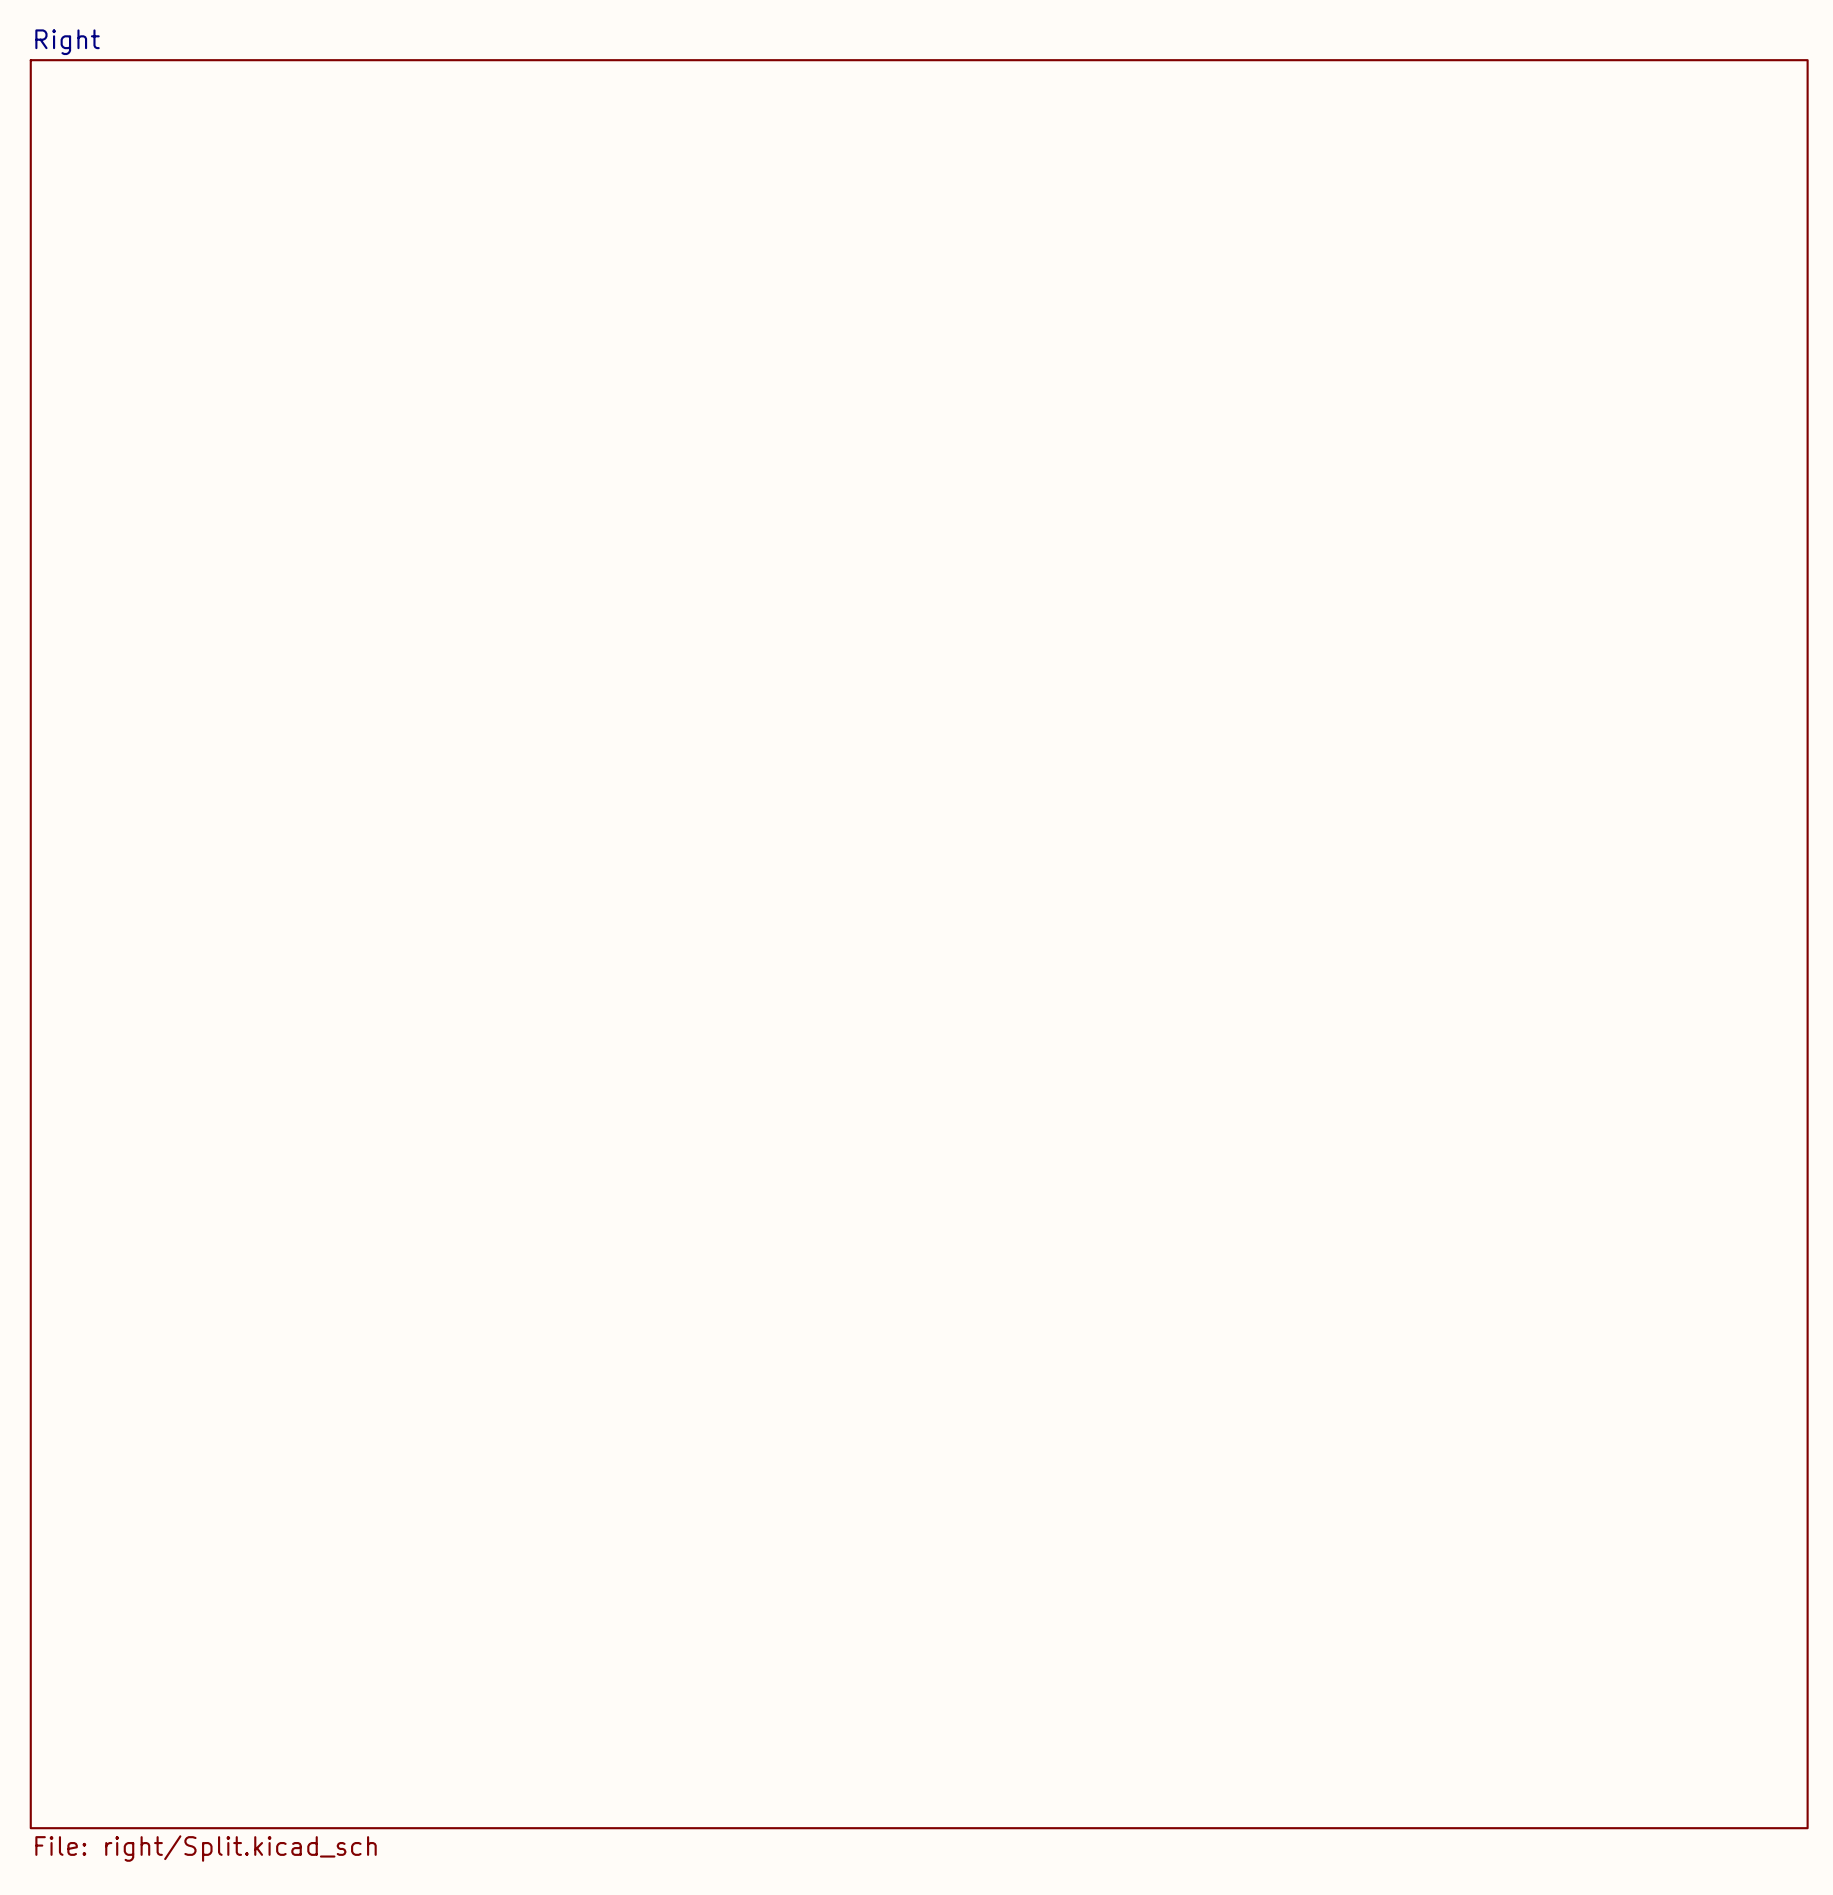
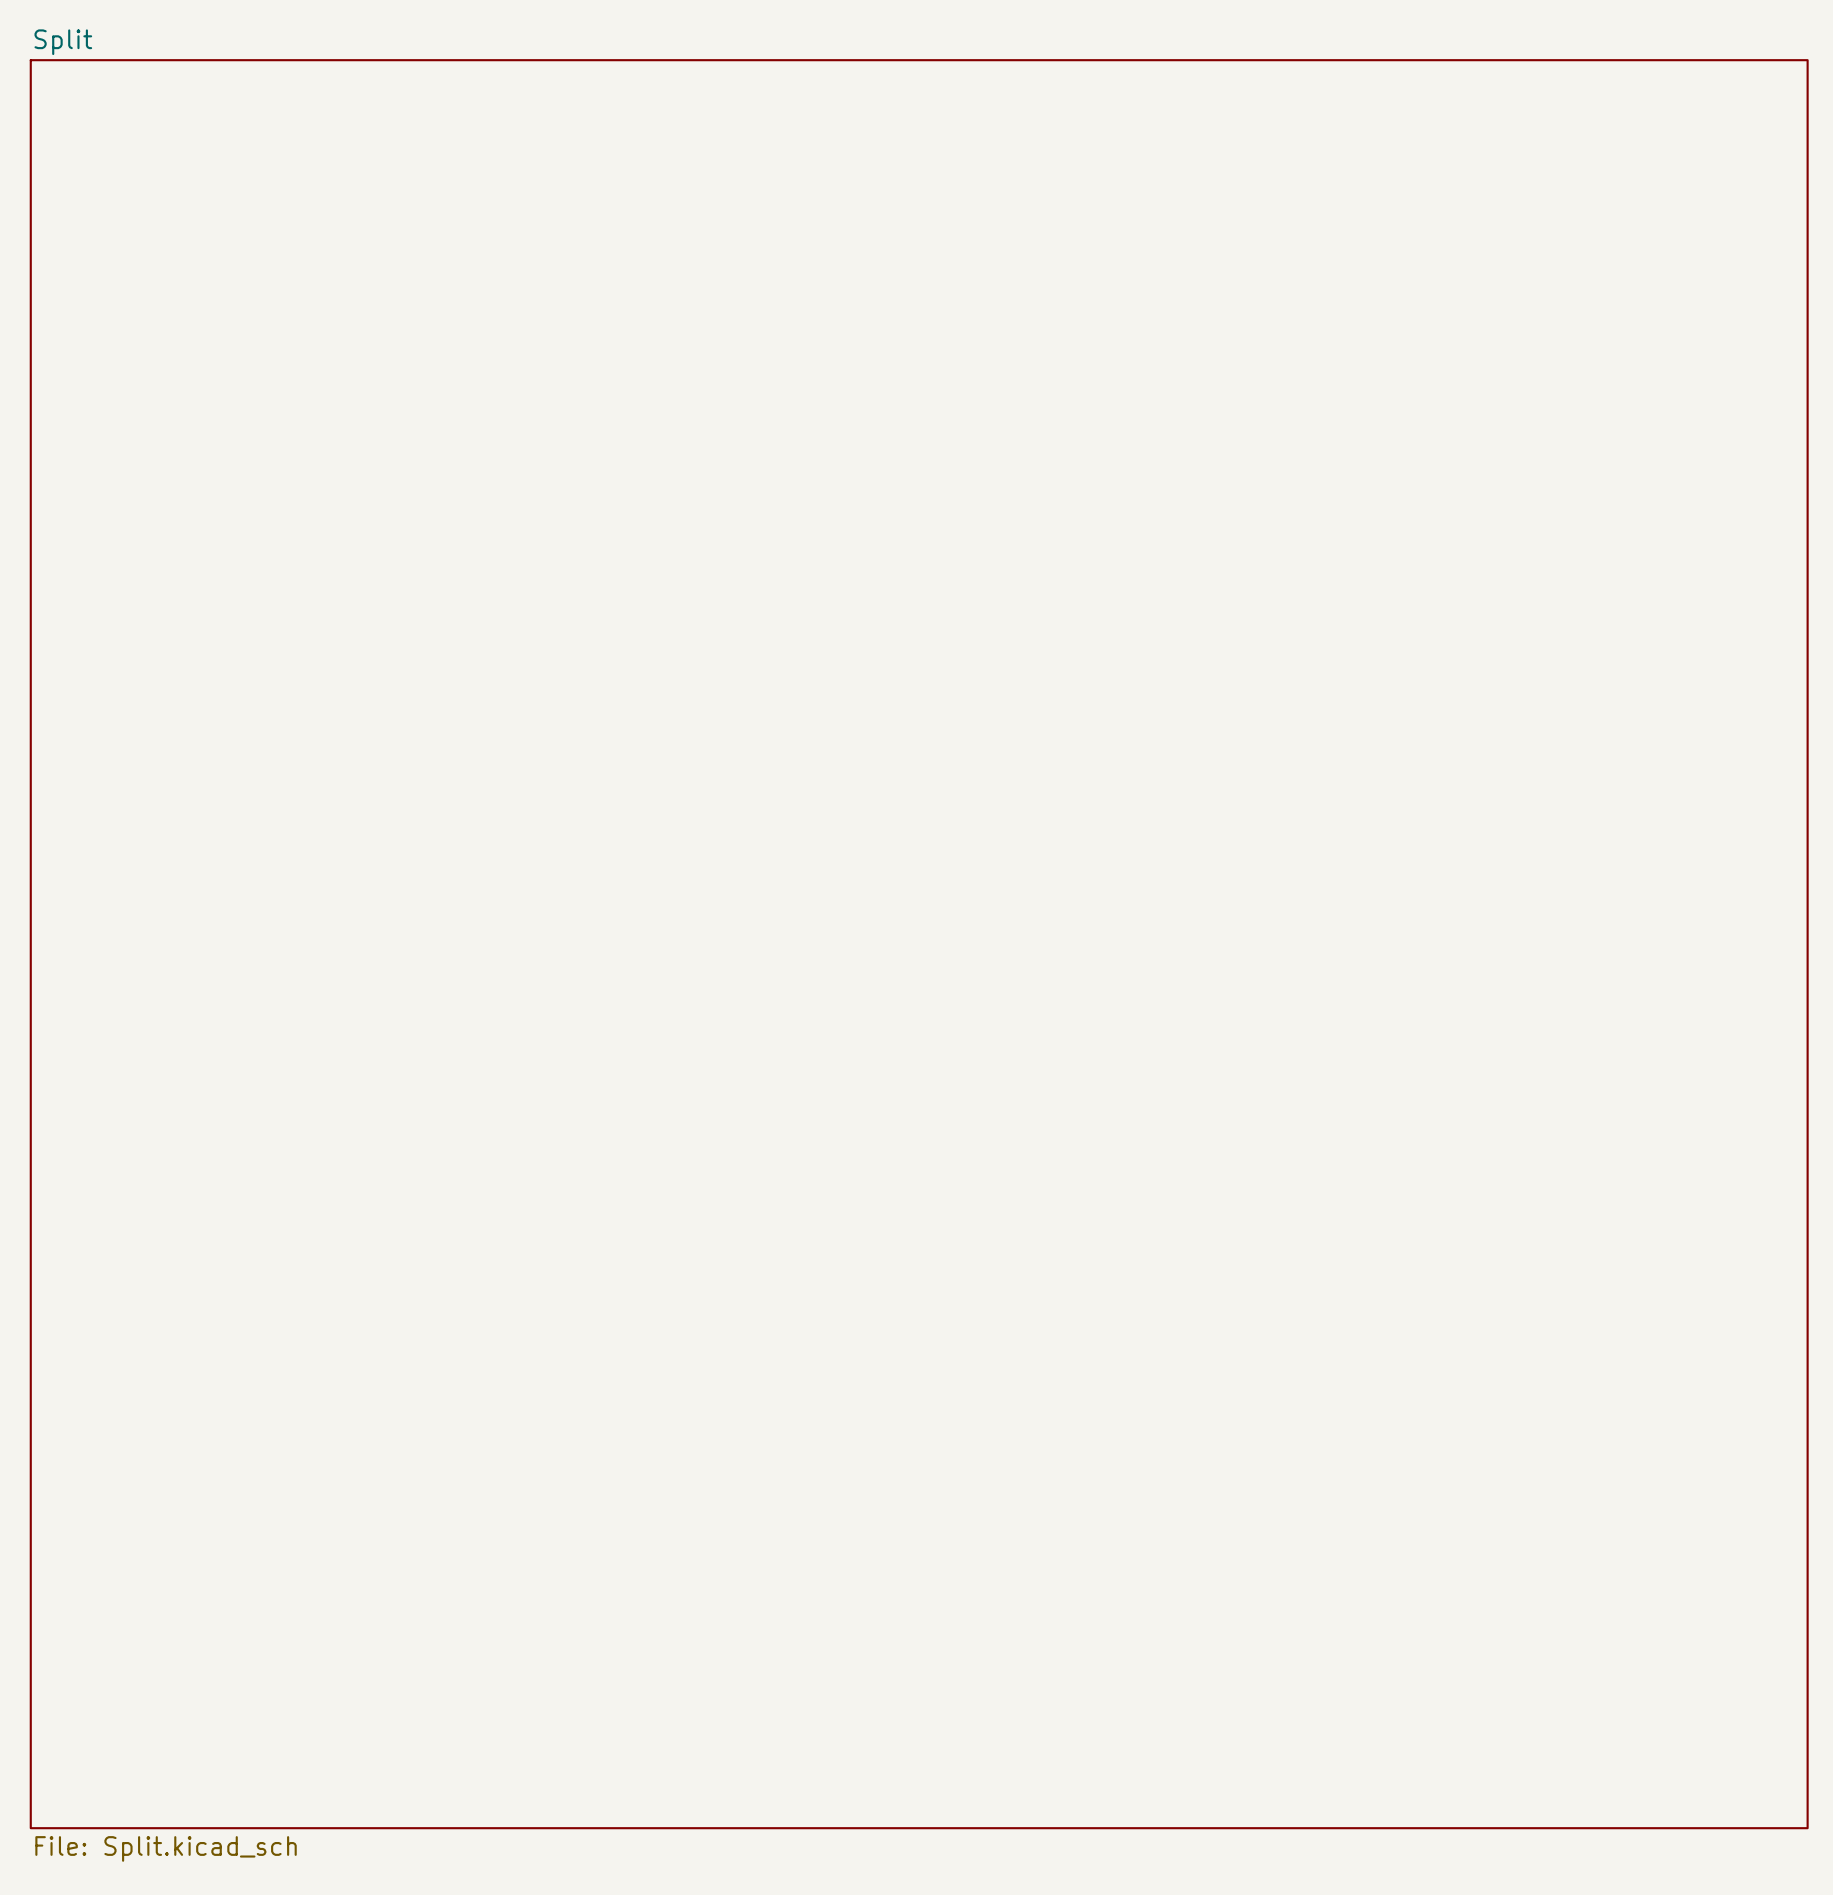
sheet Right name: Right (67, 42) -> Split (63, 42)
sheet Right value: File: right/Split.kicad_sch (206, 1848) -> File: Split.kicad_sch (166, 1848)

